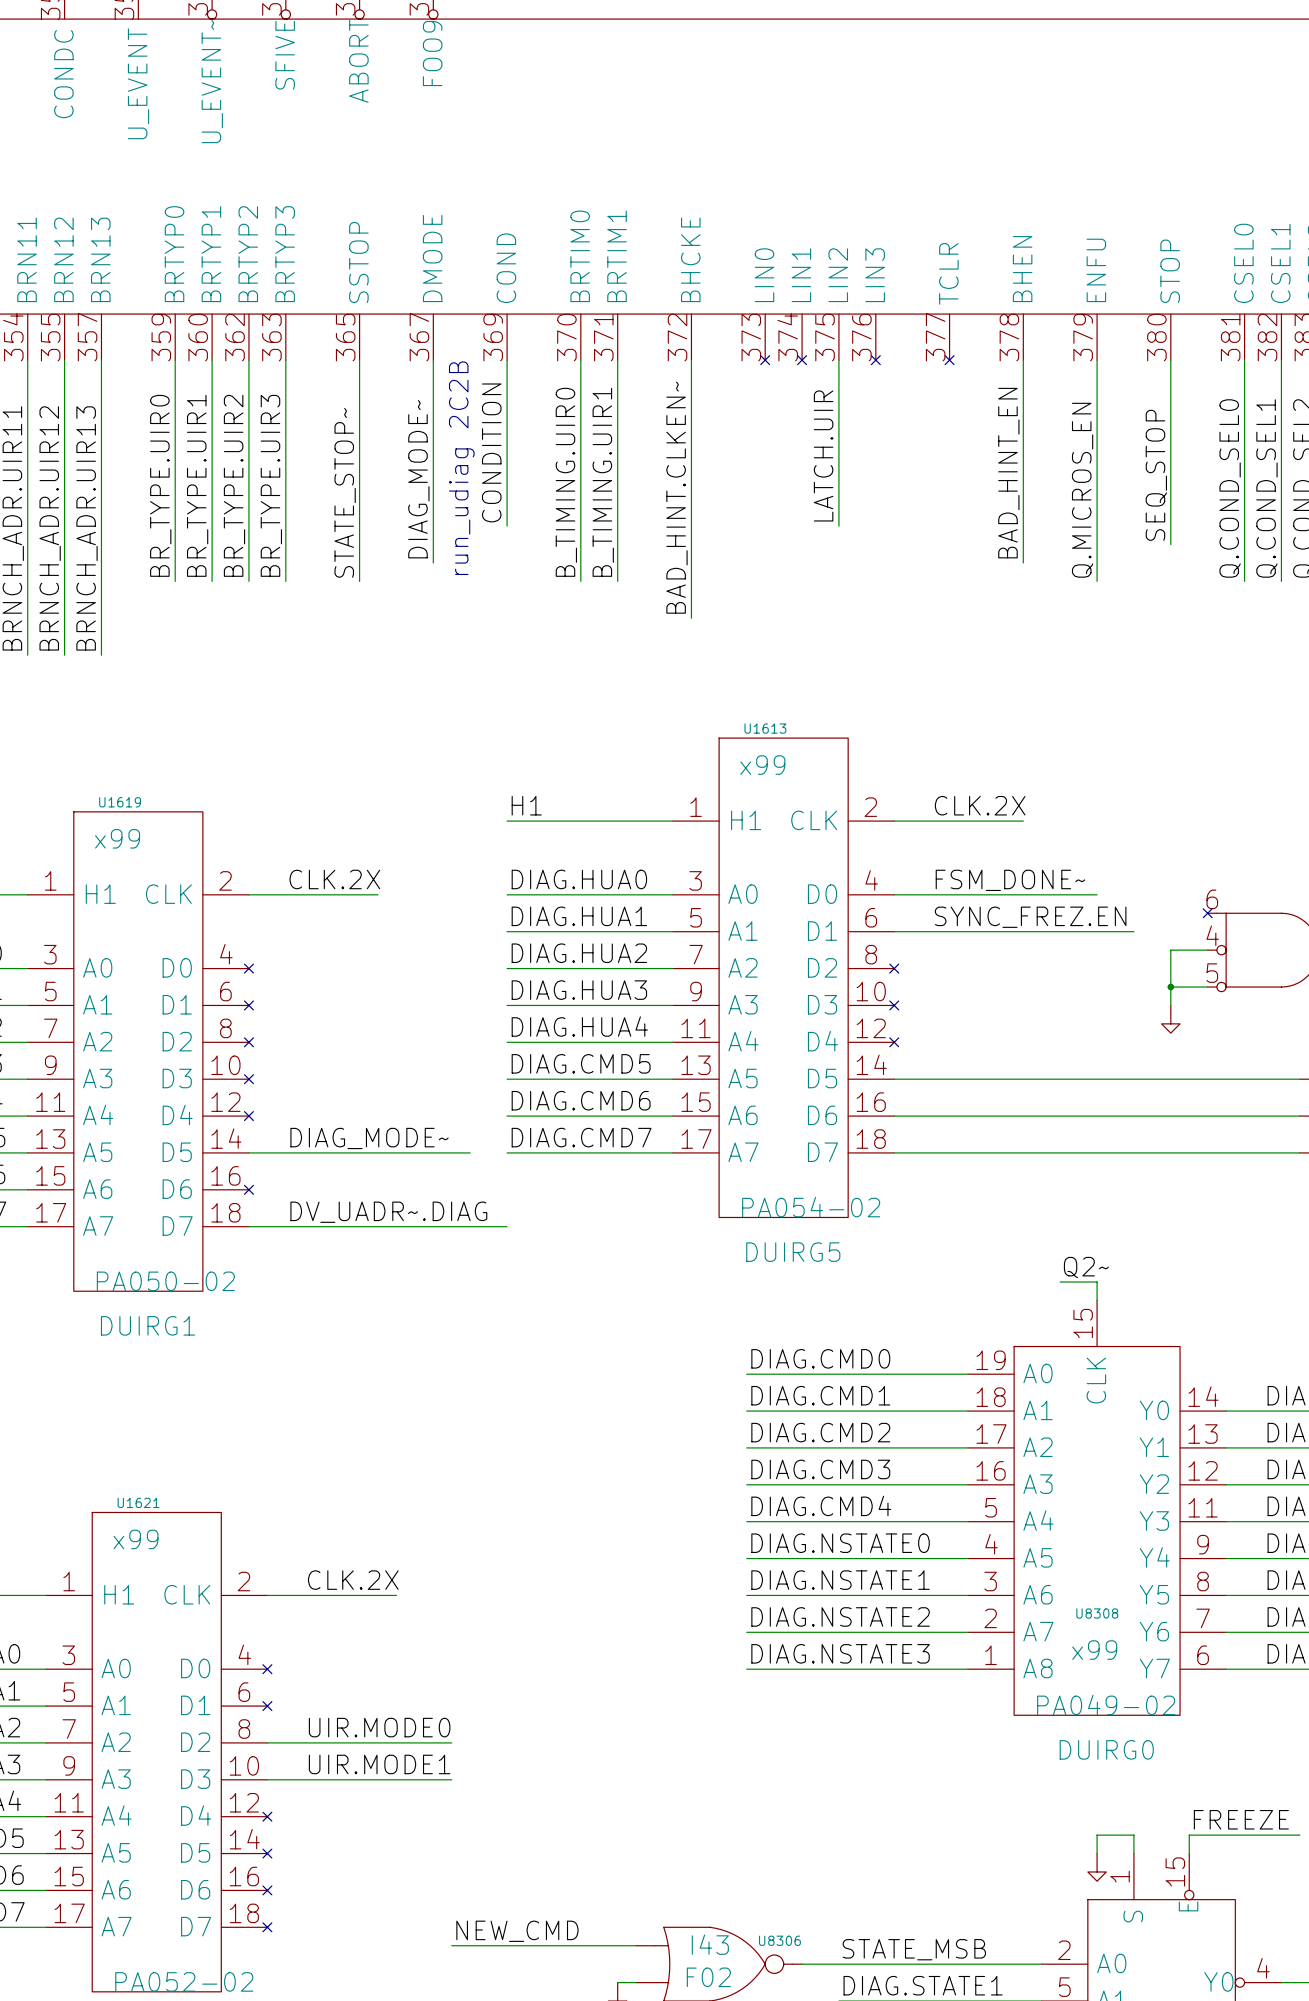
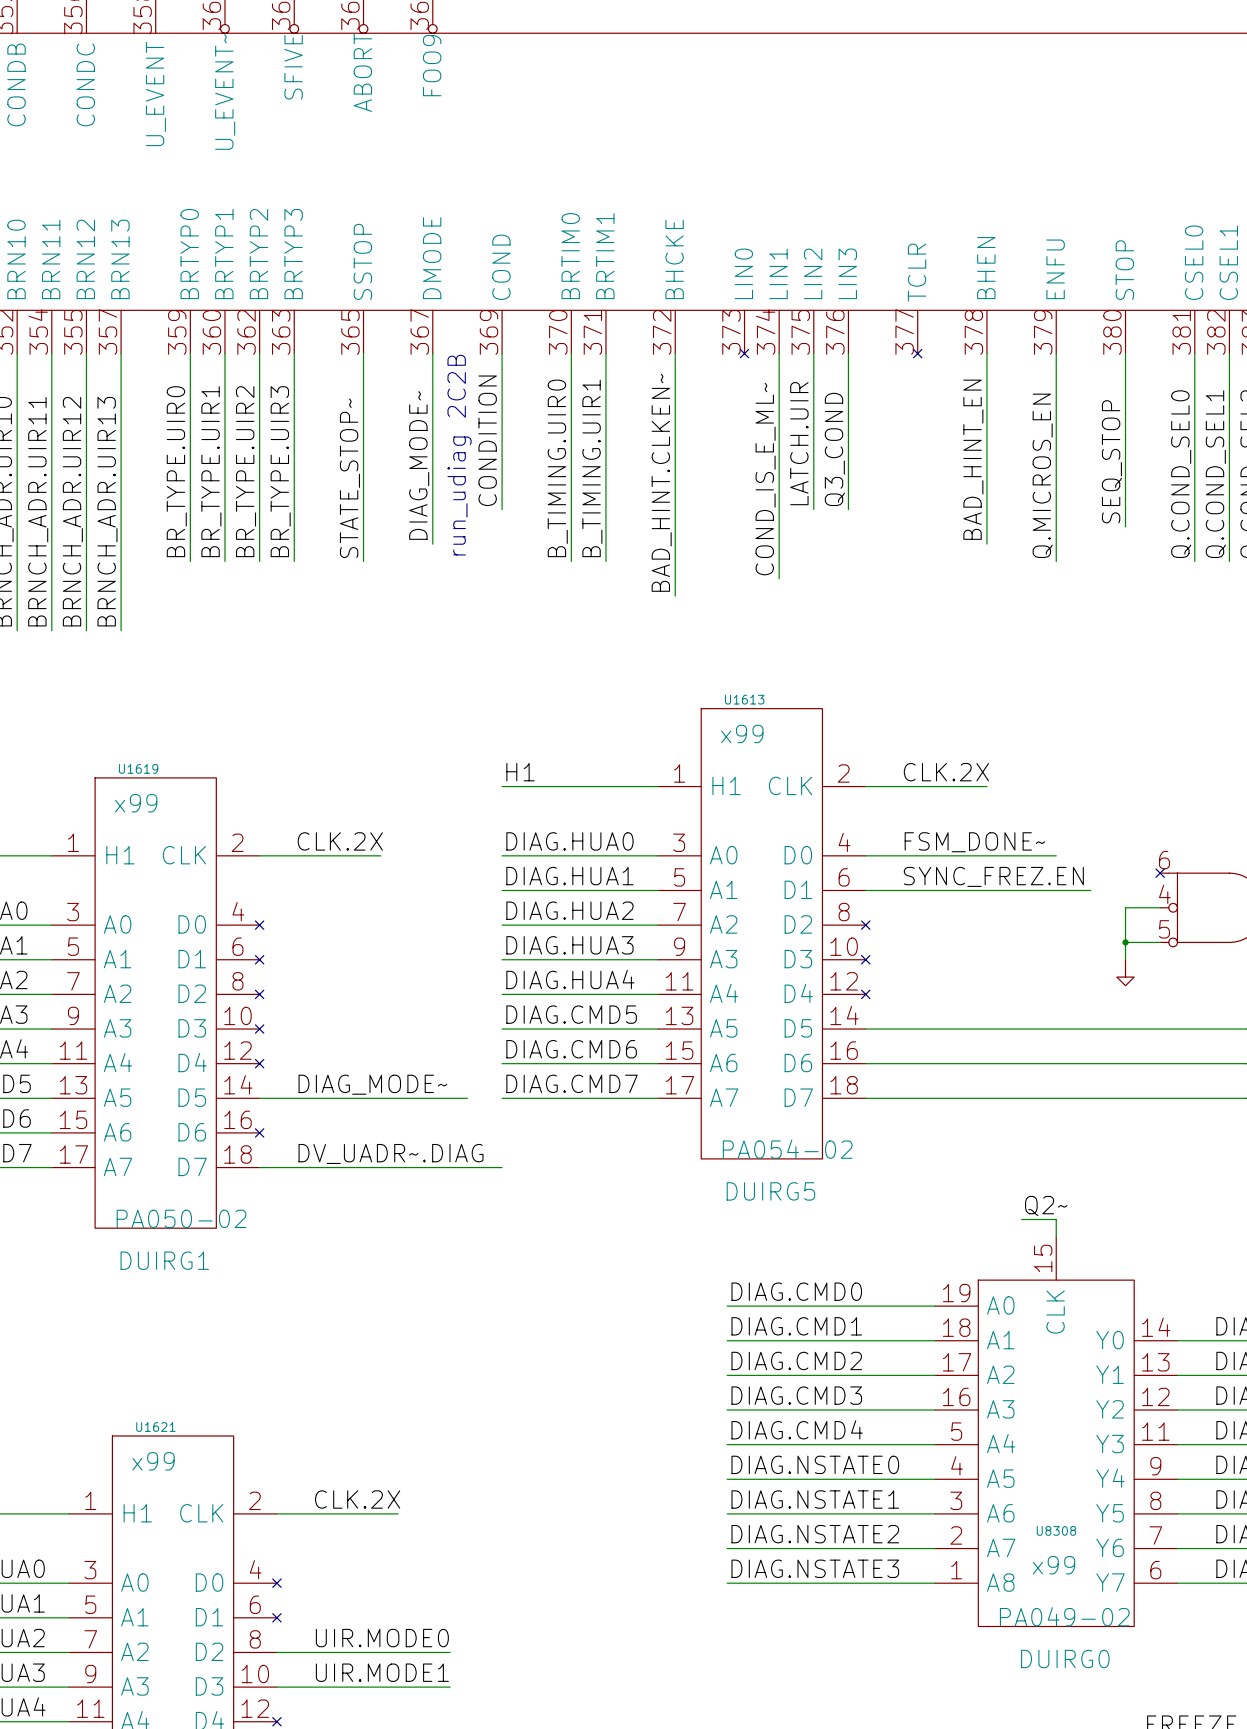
wire: none -> (779, 353) (779, 578)
no-connect mark: (802, 360) -> none
wire: none -> (848, 353) (848, 509)
no-connect mark: (875, 360) -> none
label: none -> Q3_COND (834, 449)
label: none -> COND_IS_E_ML~ (765, 479)

